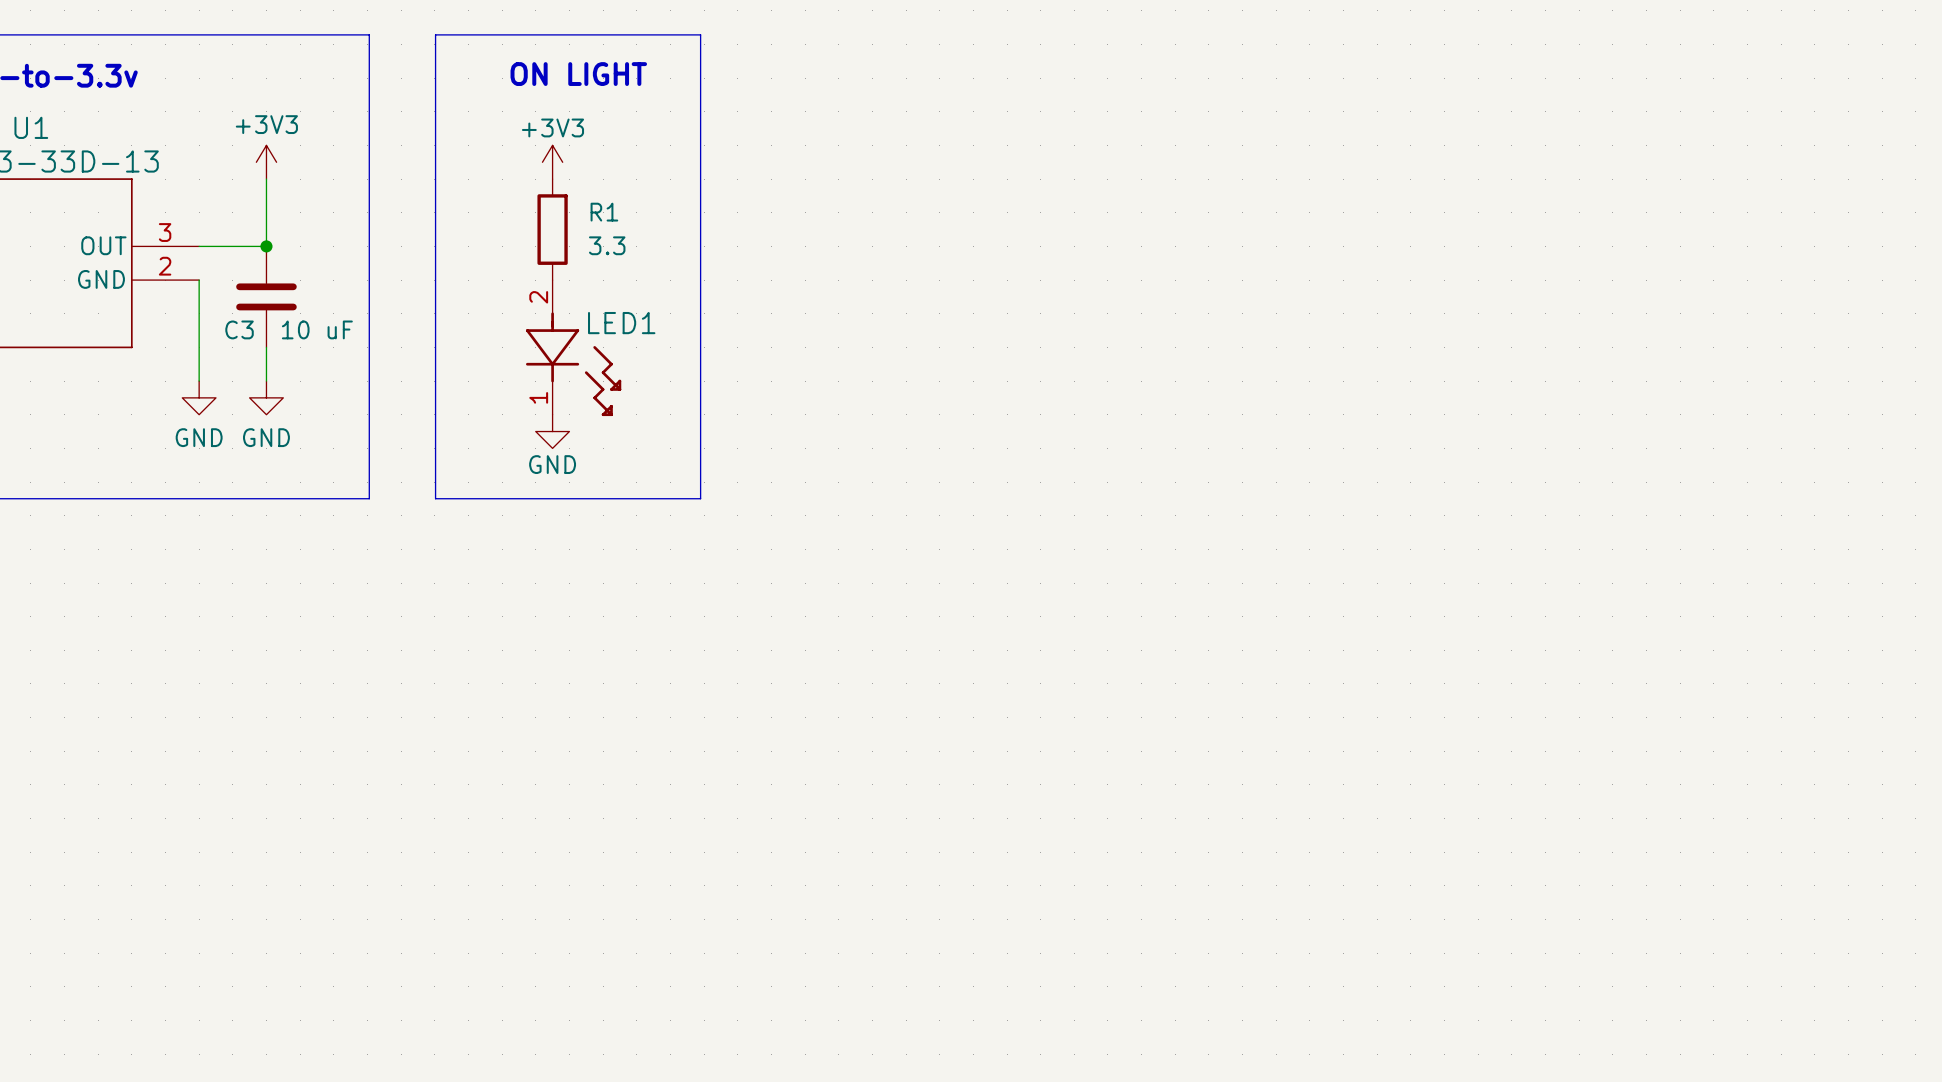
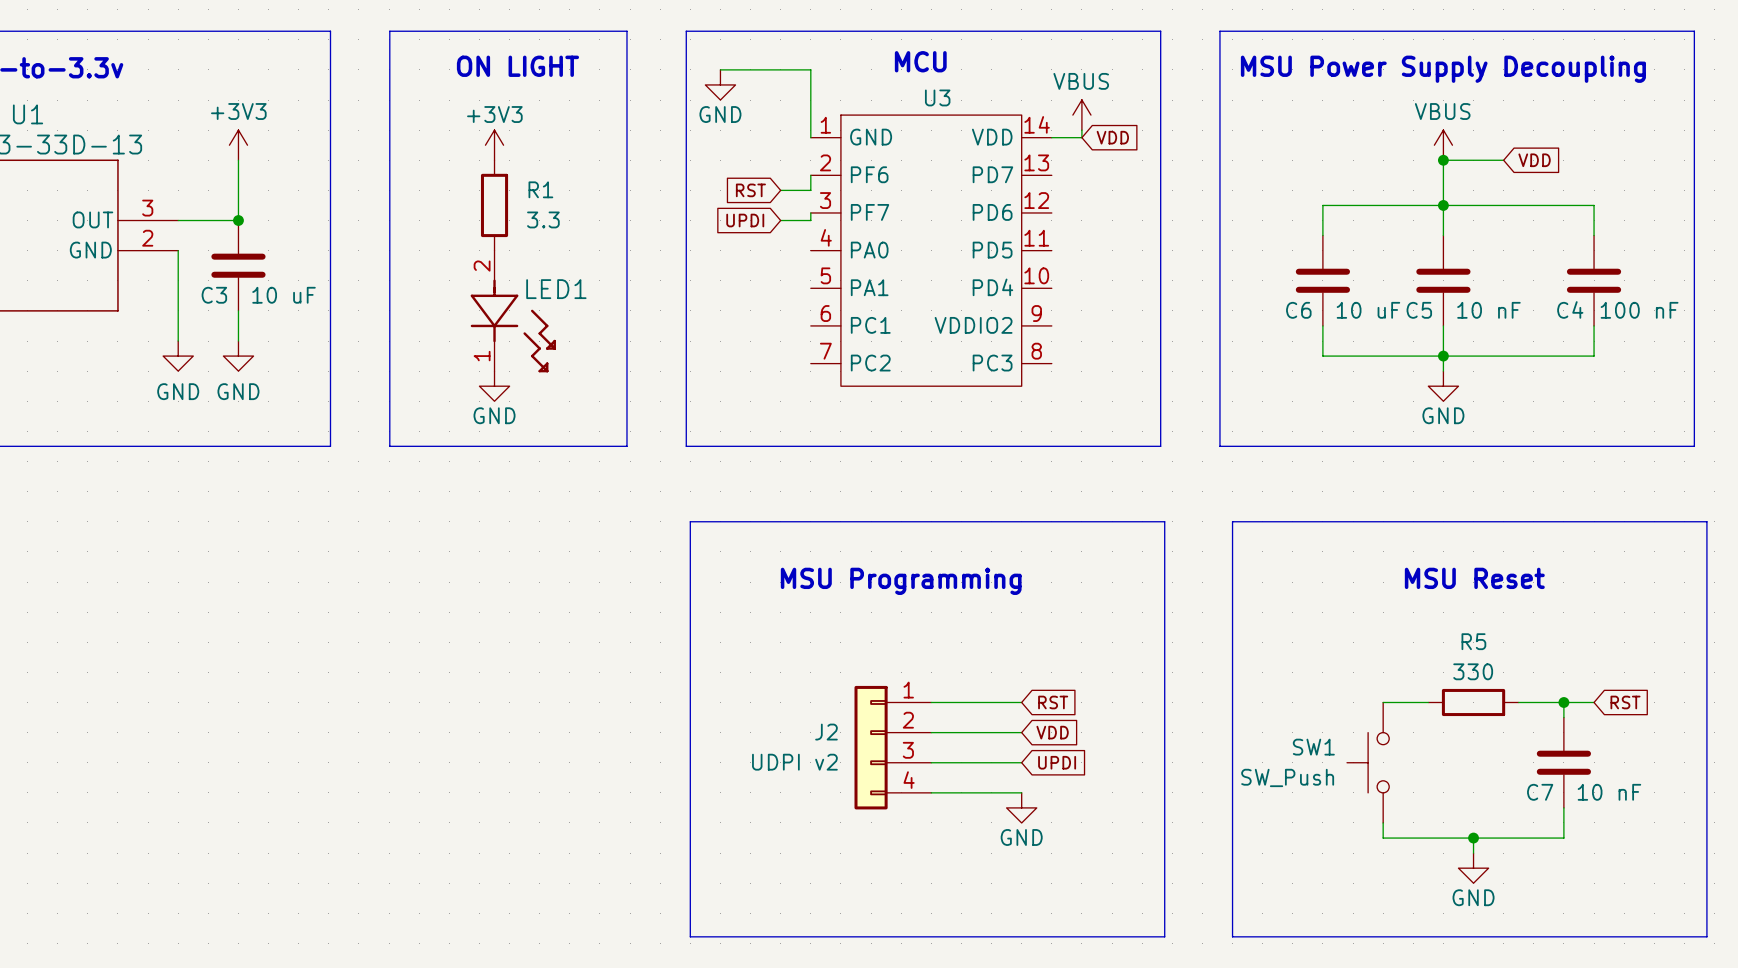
line: none -> (686, 31) (1160, 31) (1160, 446) (686, 446) (686, 31)
line: none -> (1219, 31) (1694, 31) (1694, 446) (1219, 446) (1219, 31)
text: none -> MCU (920, 61)
text: none -> MSU Power Supply Decoupling (1443, 69)
wire: none -> (720, 69) (810, 69) (810, 137)
power symbol: none -> GND (720, 84)
power symbol: none -> VBUS (1081, 115)
wire: none -> (1081, 130) (1081, 137) (1051, 137)
global label: none -> VDD (1112, 137)
power symbol: none -> VBUS (1443, 145)
junction: none -> (1443, 160)
wire: none -> (1503, 160) (1443, 160) (1443, 235)
global label: none -> VDD (1534, 160)
wire: none -> (810, 175) (810, 190) (780, 190)
global label: none -> RST (750, 190)
junction: none -> (1443, 205)
wire: none -> (810, 212) (810, 220) (780, 220)
global label: none -> UPDI (745, 220)
wire: none -> (1322, 235) (1322, 205) (1594, 205) (1594, 235)
U3: none -> (931, 250)
C6: none -> 10 uF (1322, 280)
C5: none -> 10 nF (1443, 280)
C4: none -> 100 nF (1594, 280)
wire: none -> (1322, 325) (1322, 356) (1594, 356) (1594, 325)
wire: none -> (1443, 325) (1443, 371)
junction: none -> (1443, 356)
power symbol: none -> GND (1443, 386)
line: none -> (690, 521) (1164, 521) (1164, 936) (690, 936) (690, 521)
line: none -> (1232, 521) (1706, 521) (1706, 936) (1232, 936) (1232, 521)
text: none -> MSU Reset (1474, 578)
text: none -> MSU Programming (901, 581)
wire: none -> (931, 702) (1021, 702)
global label: none -> RST (1053, 702)
wire: none -> (1383, 702) (1428, 702)
R5: none -> 330 (1473, 702)
wire: none -> (1518, 702) (1594, 702)
wire: none -> (1563, 702) (1563, 717)
junction: none -> (1563, 702)
global label: none -> RST (1625, 702)
wire: none -> (931, 732) (1021, 732)
global label: none -> VDD (1052, 732)
J2: none -> UDPI v2 (892, 747)
wire: none -> (931, 762) (1021, 762)
global label: none -> UPDI (1057, 762)
SW1: none -> SW_Push (1368, 762)
C7: none -> 10 nF (1563, 762)
wire: none -> (931, 792) (1021, 792)
power symbol: none -> GND (1021, 807)
wire: none -> (1563, 807) (1563, 838) (1383, 838) (1383, 822)
wire: none -> (1473, 838) (1473, 853)
junction: none -> (1473, 838)
power symbol: none -> GND (1473, 868)

